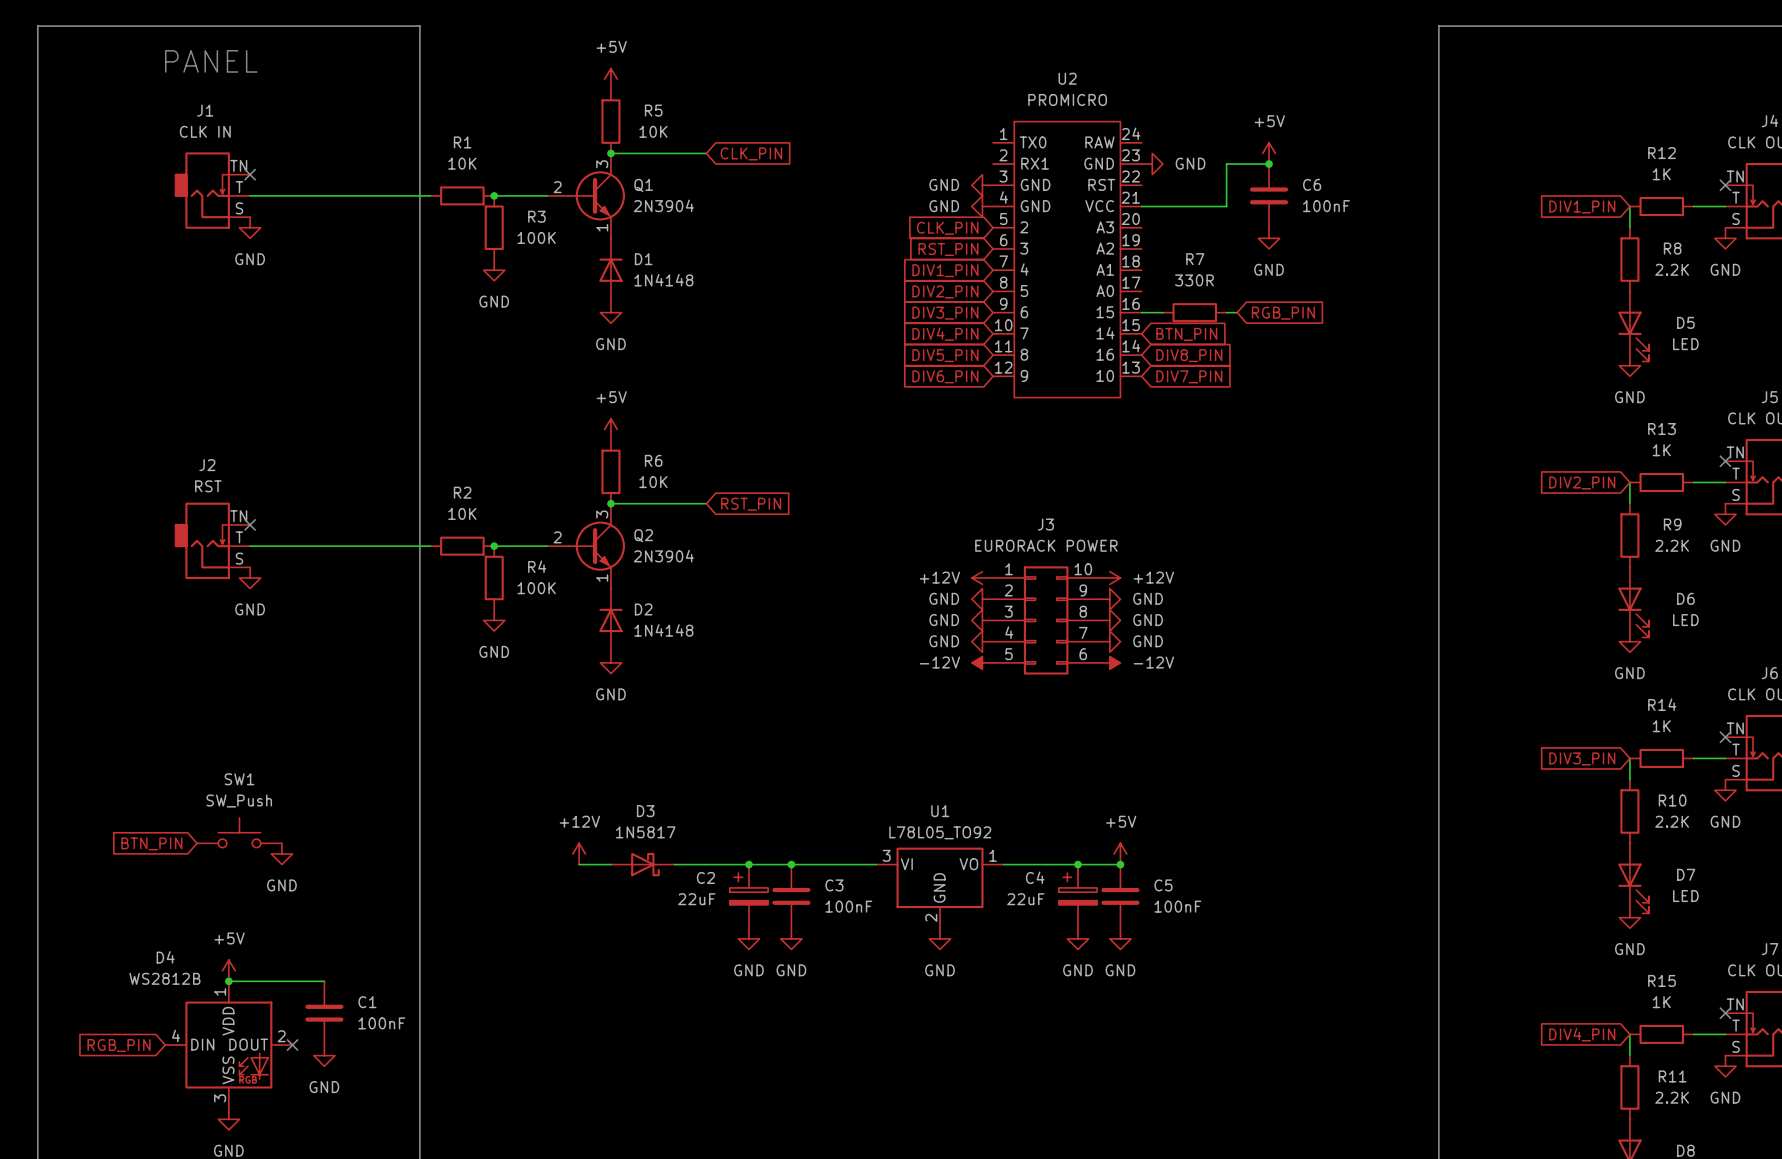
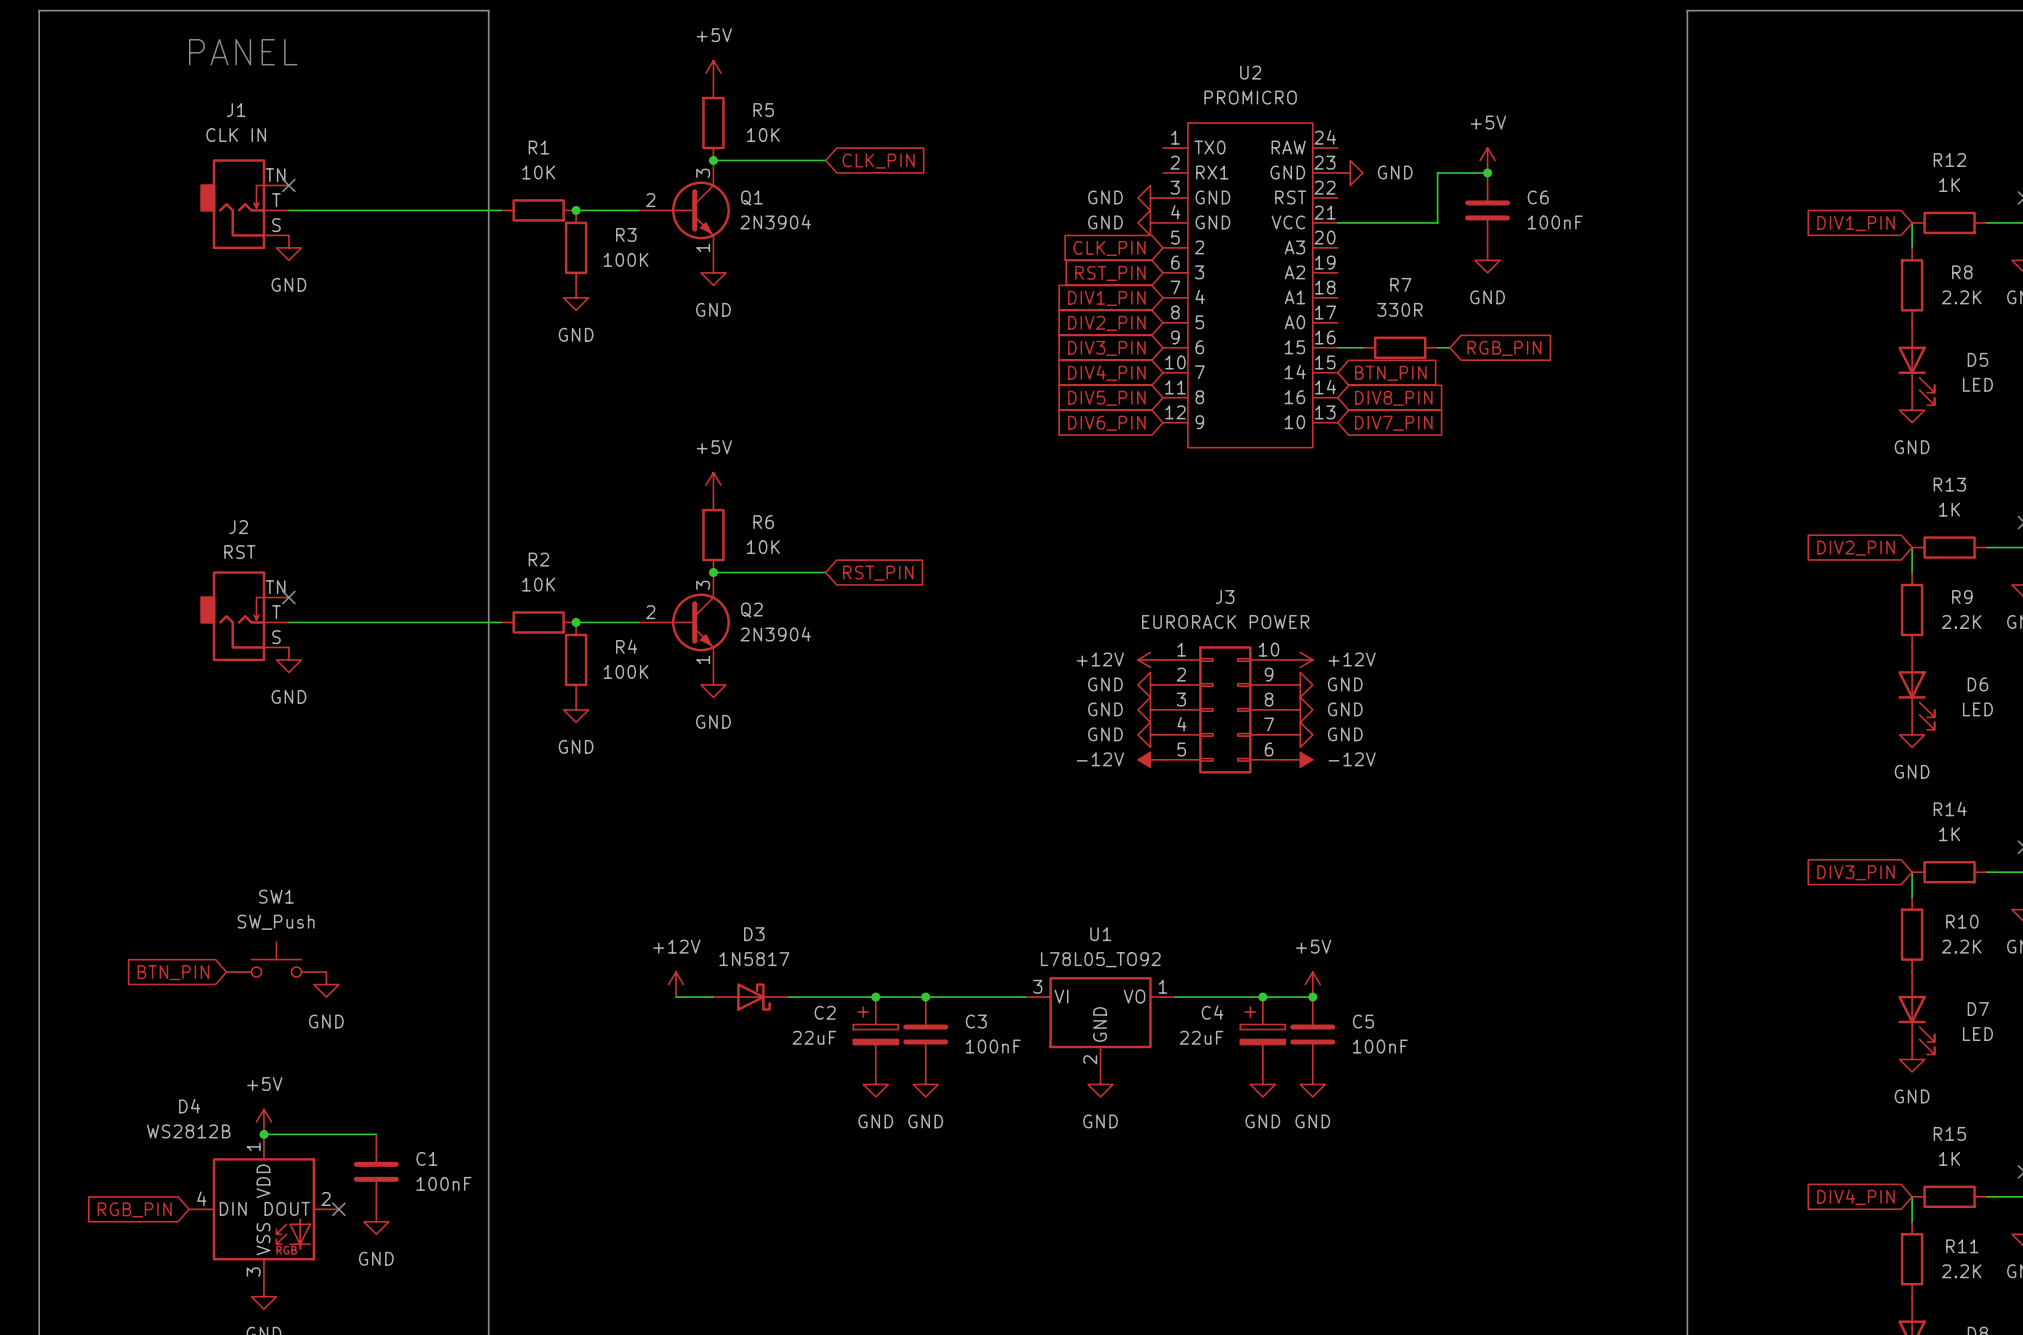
D1: 1N4148 (610, 270) -> none
power symbol position: GND (610, 312) -> GND (713, 272)
D2: 1N4148 (610, 620) -> none
power symbol position: GND (610, 662) -> GND (713, 684)

